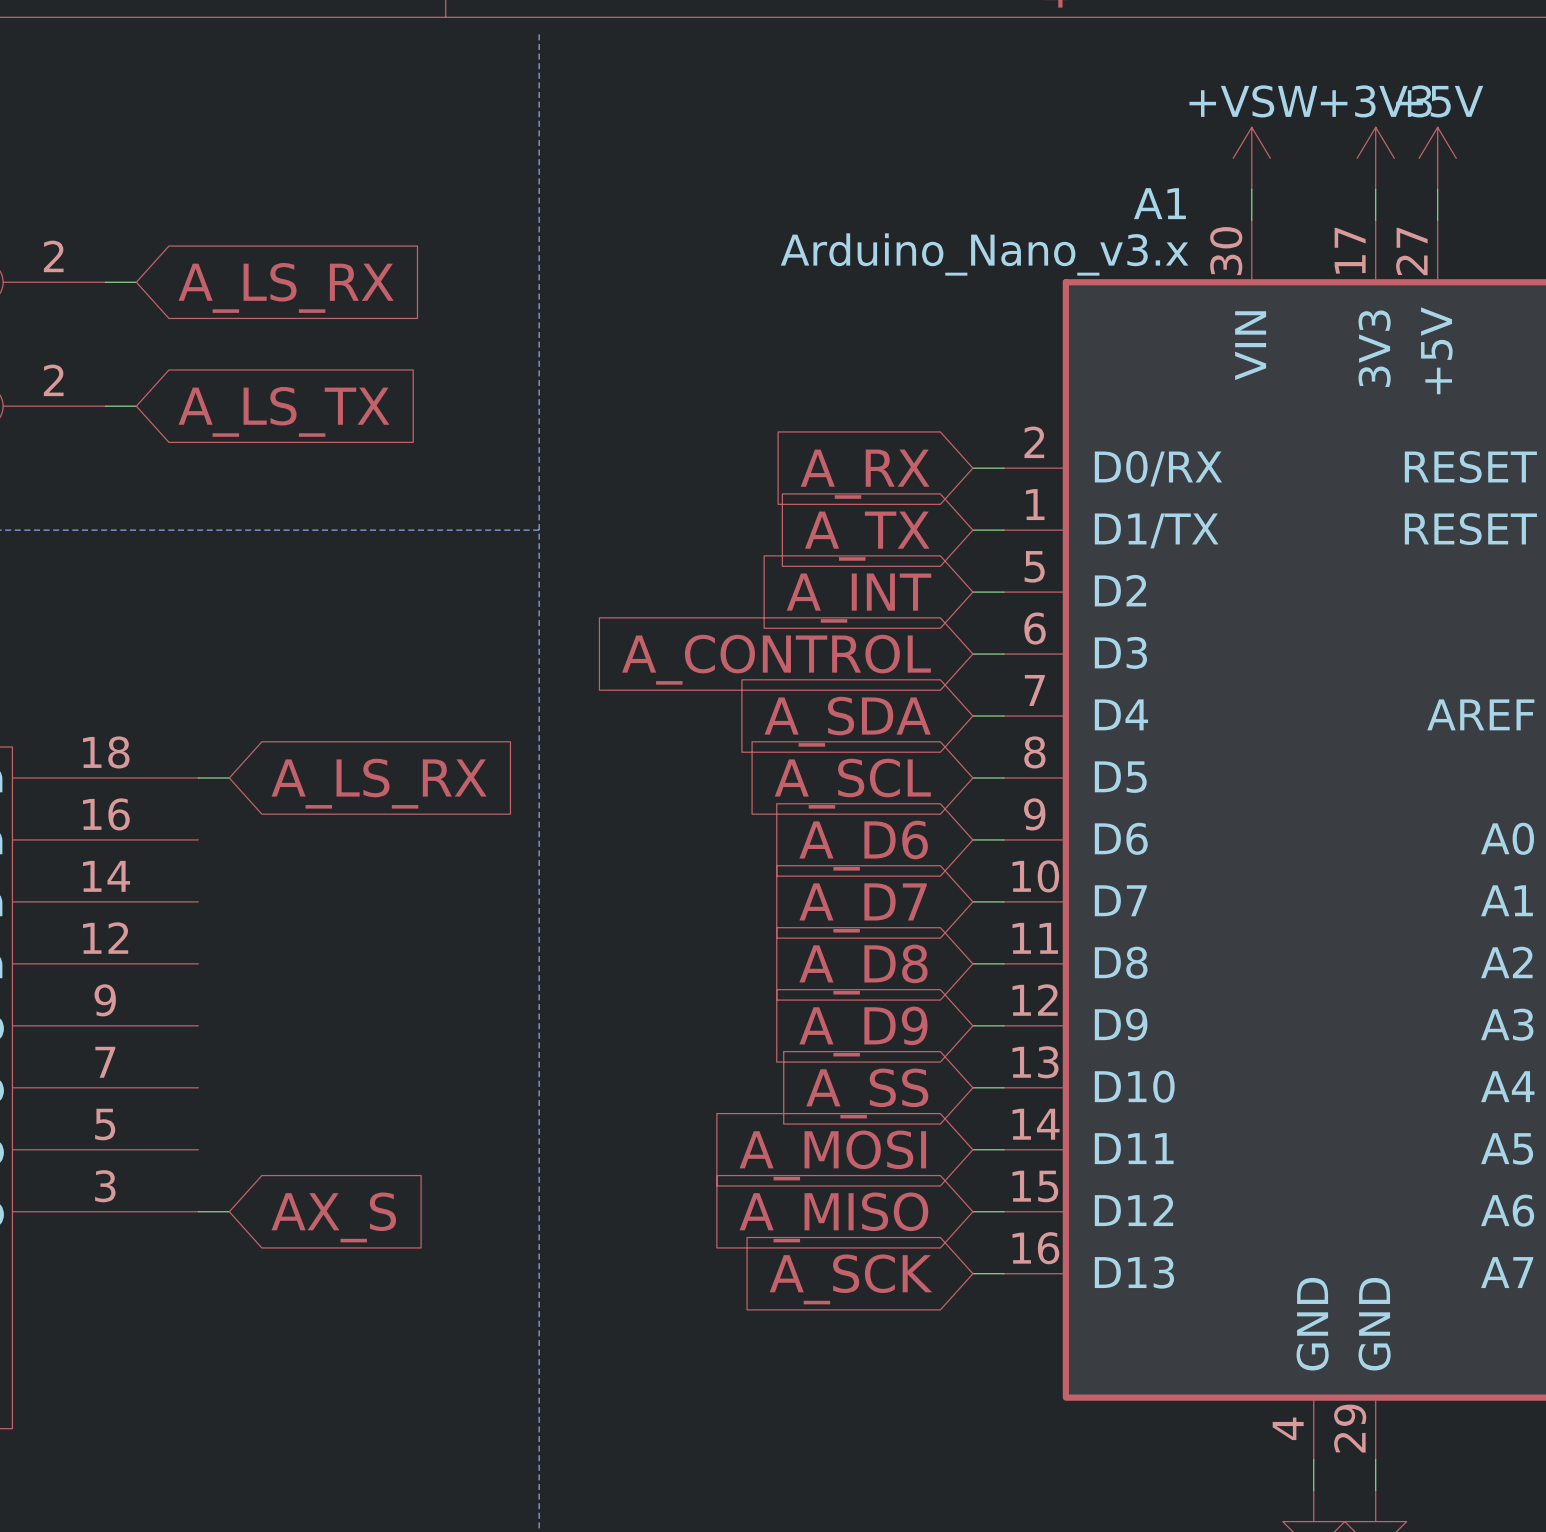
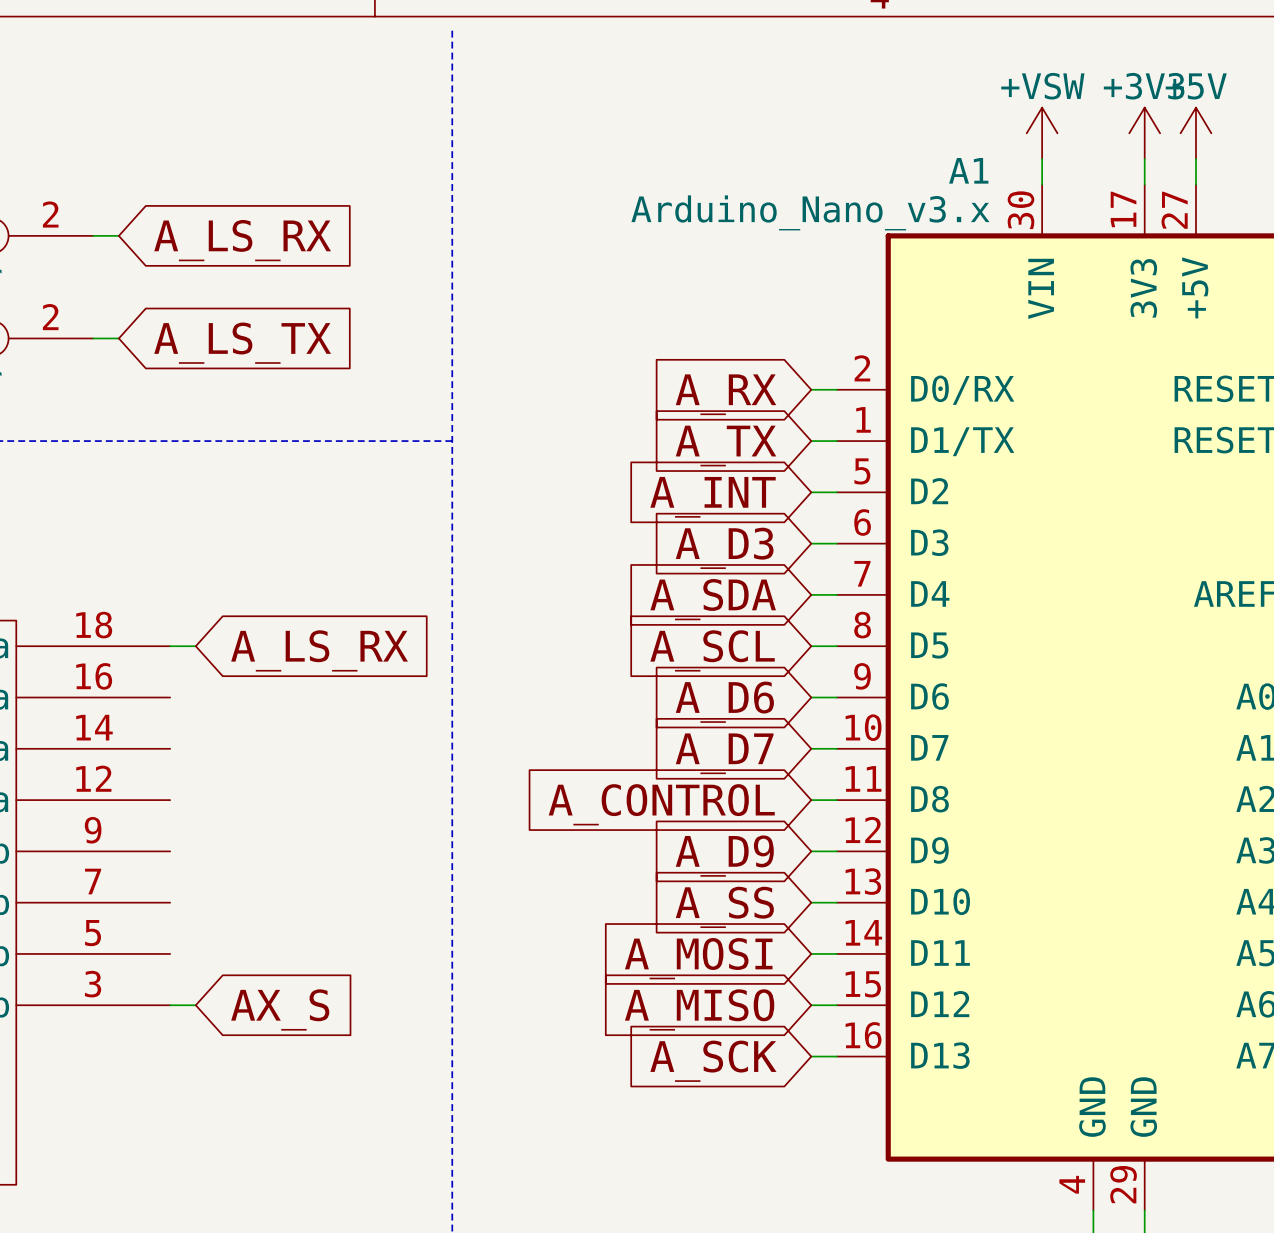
global label: A_CONTROL (776, 659) -> A_D3 (724, 548)
global label: A_D8 (863, 969) -> A_CONTROL (661, 804)

